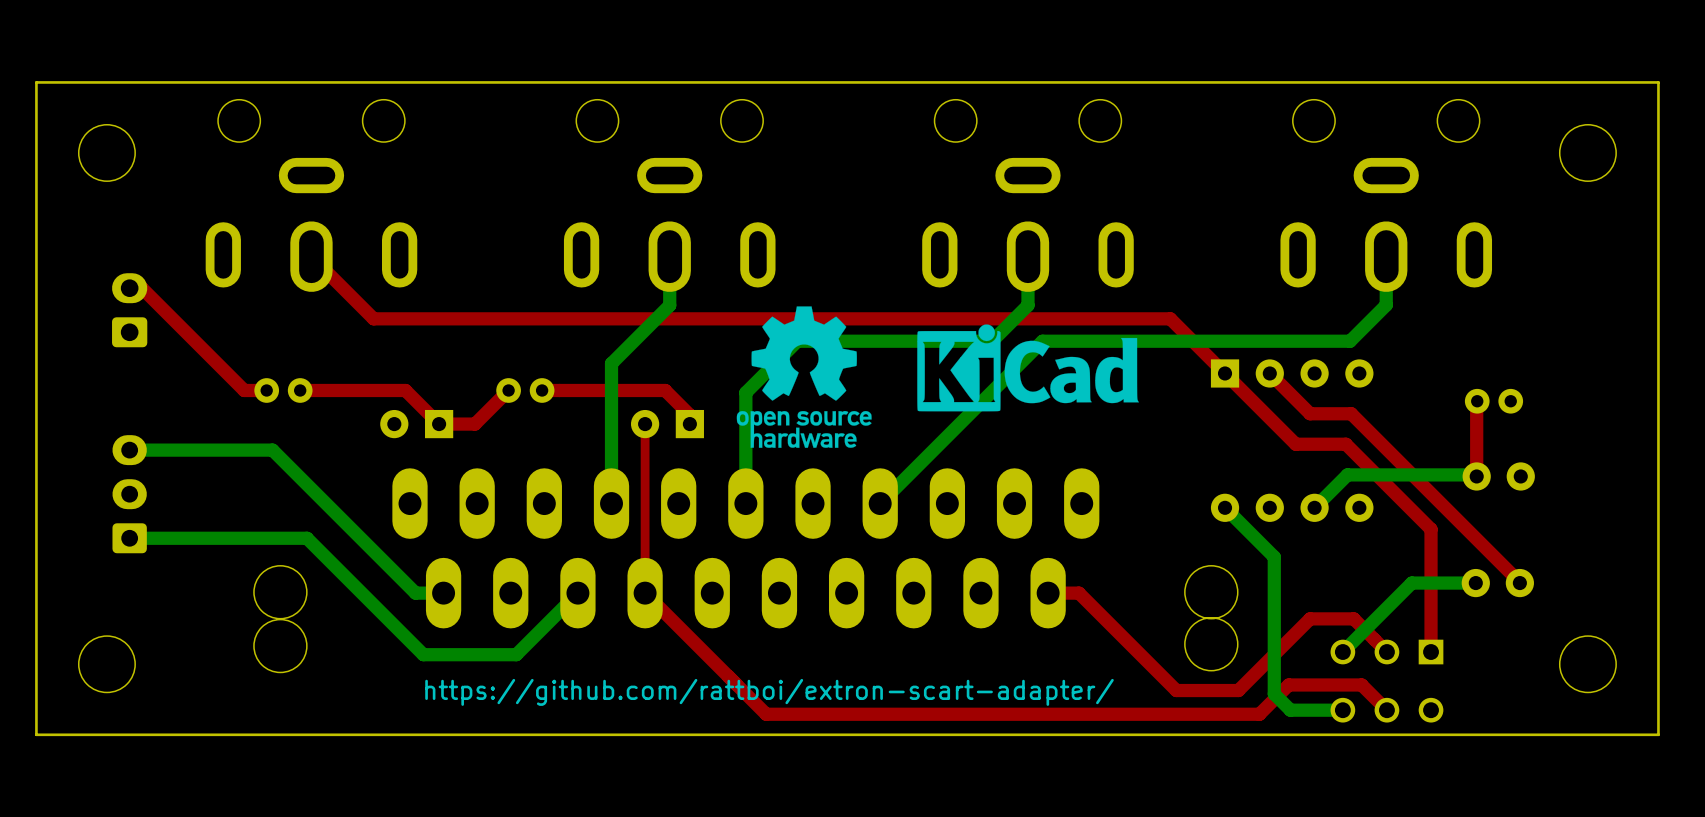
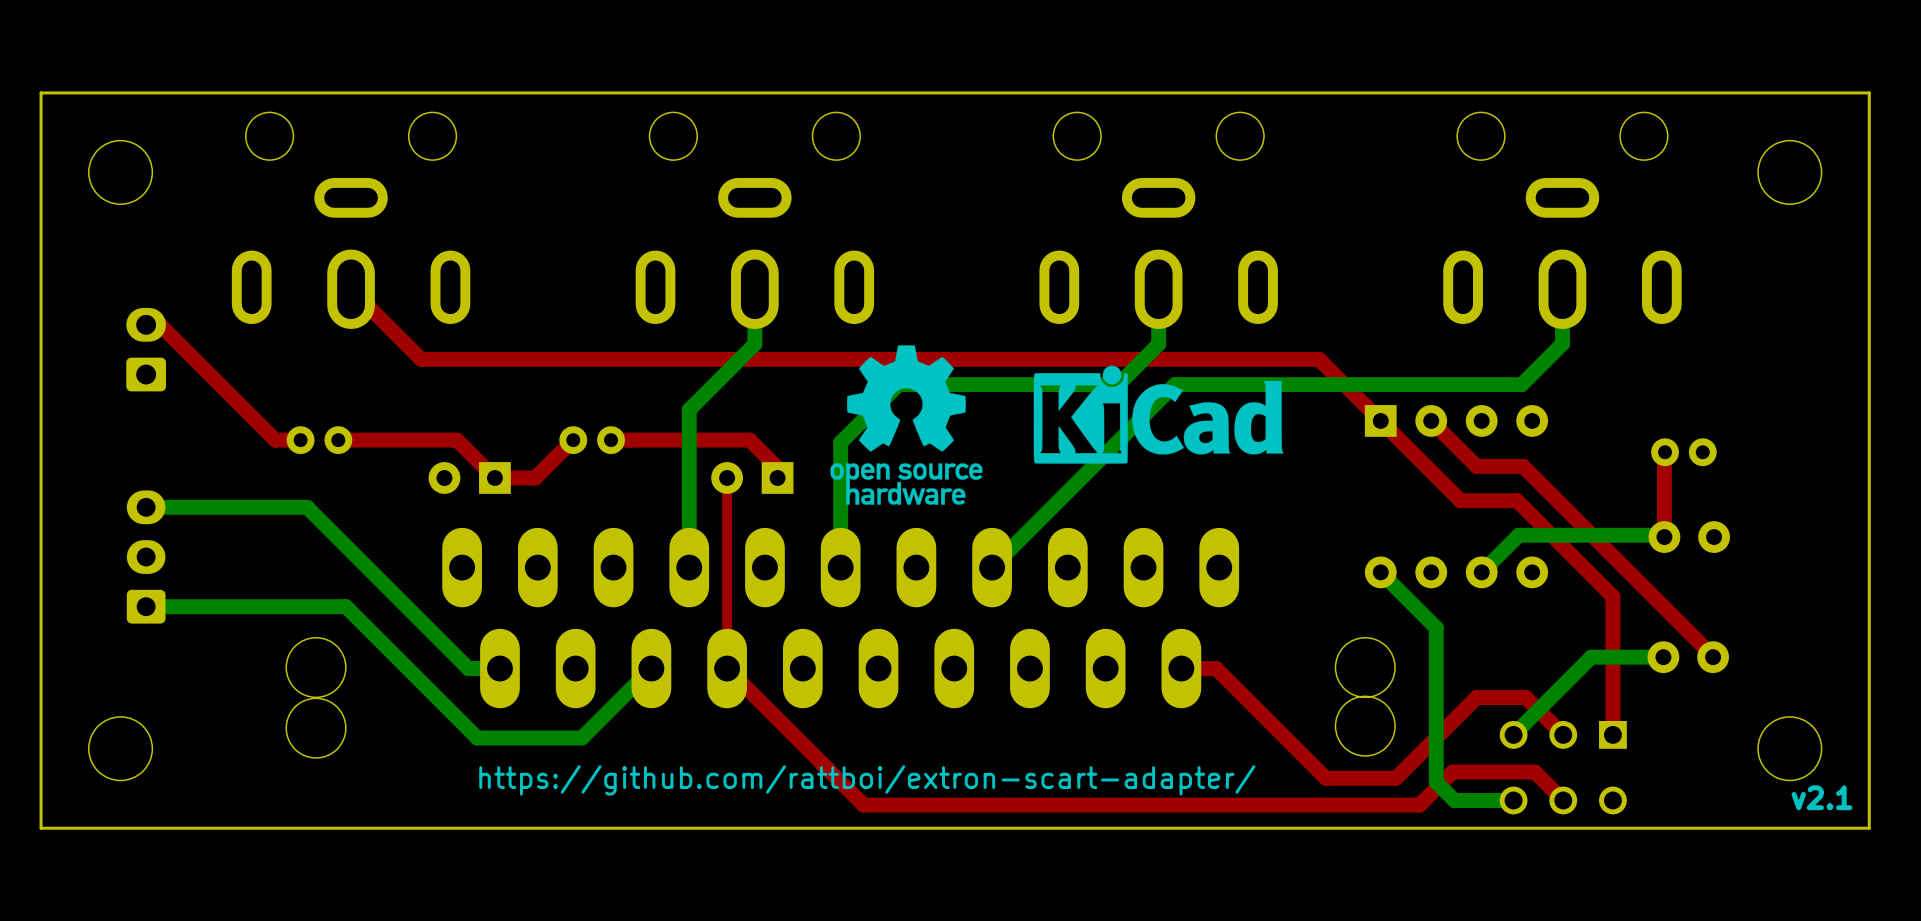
text: none -> v2.1 (1821, 797)

